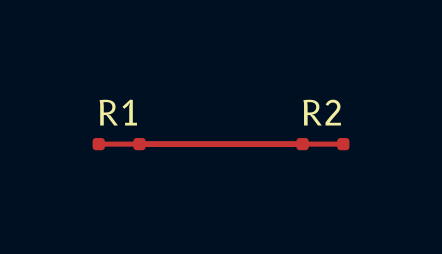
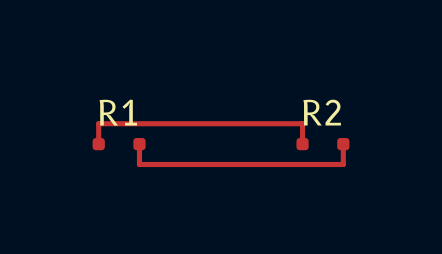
track: (98, 144) (343, 144) -> (98, 144) (98, 123) (302, 123) (302, 144)
track: none -> (139, 144) (139, 164) (343, 164) (343, 144)

